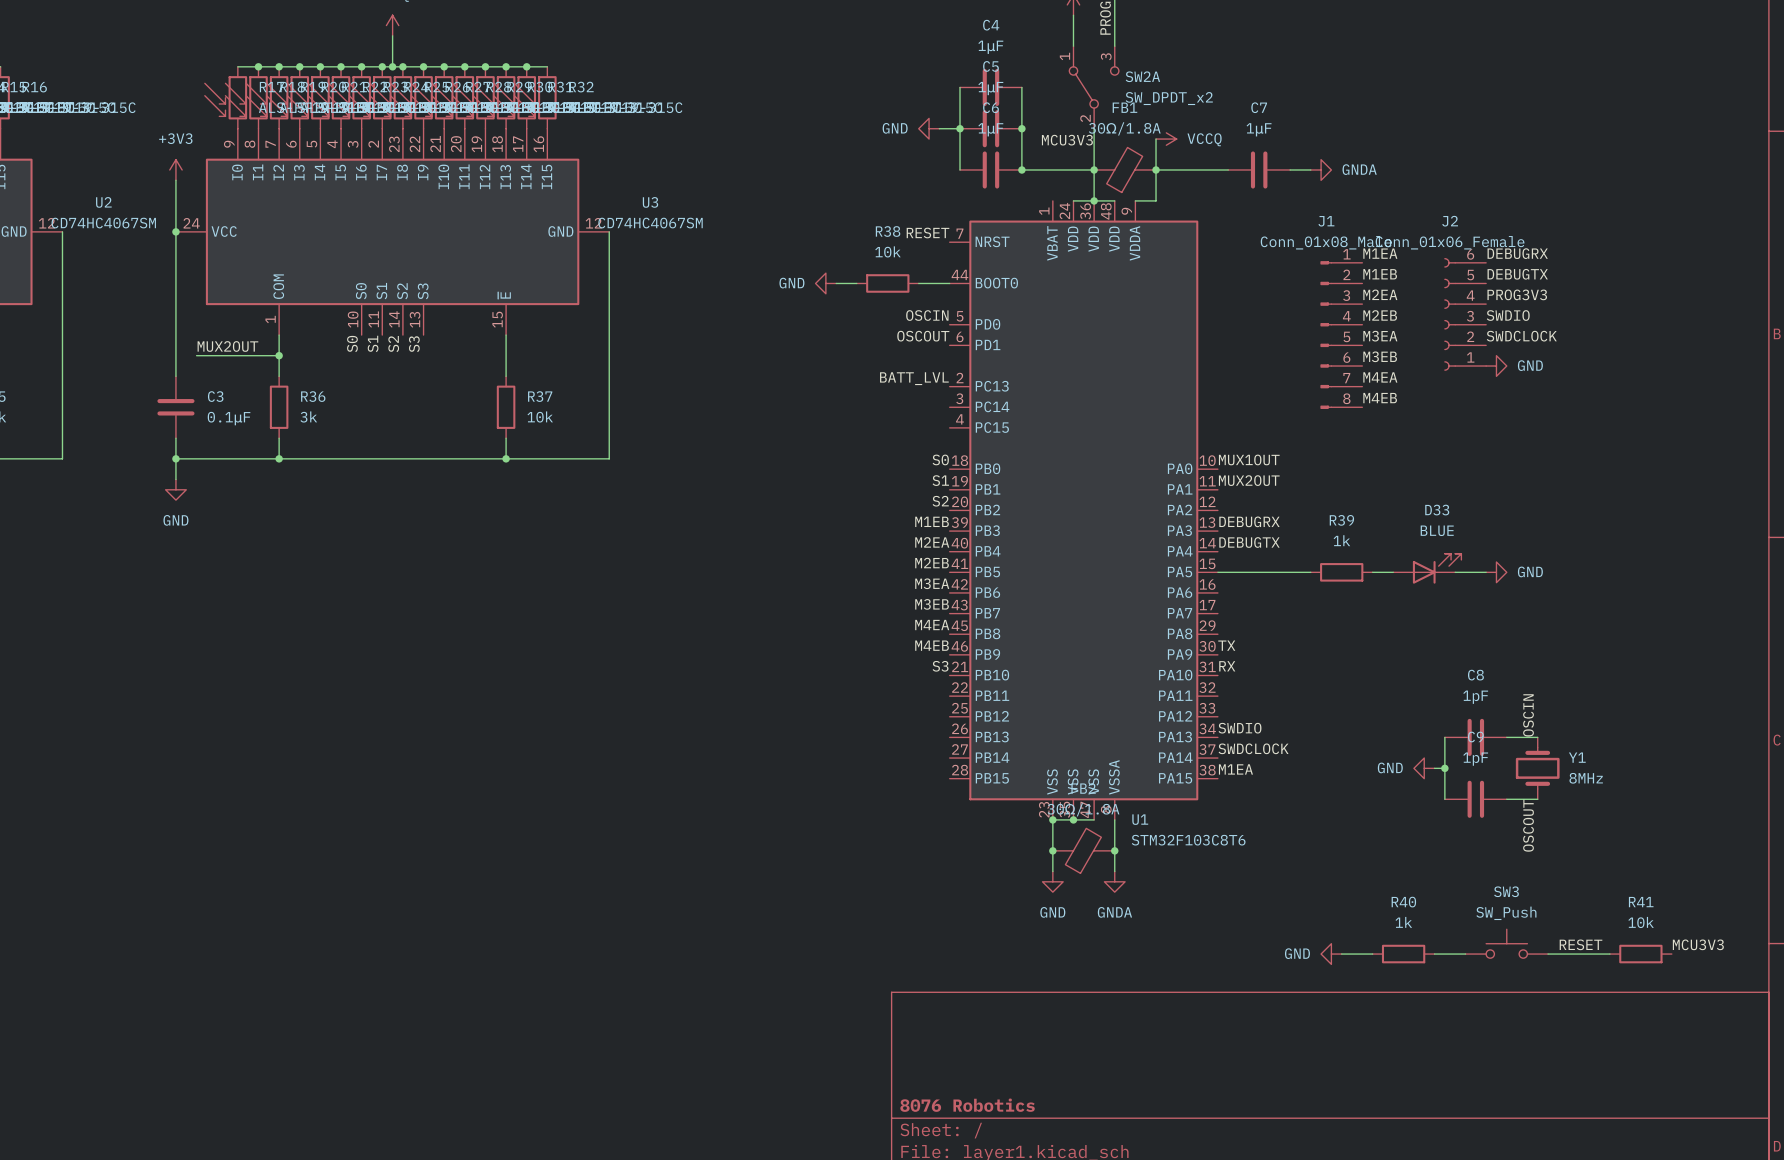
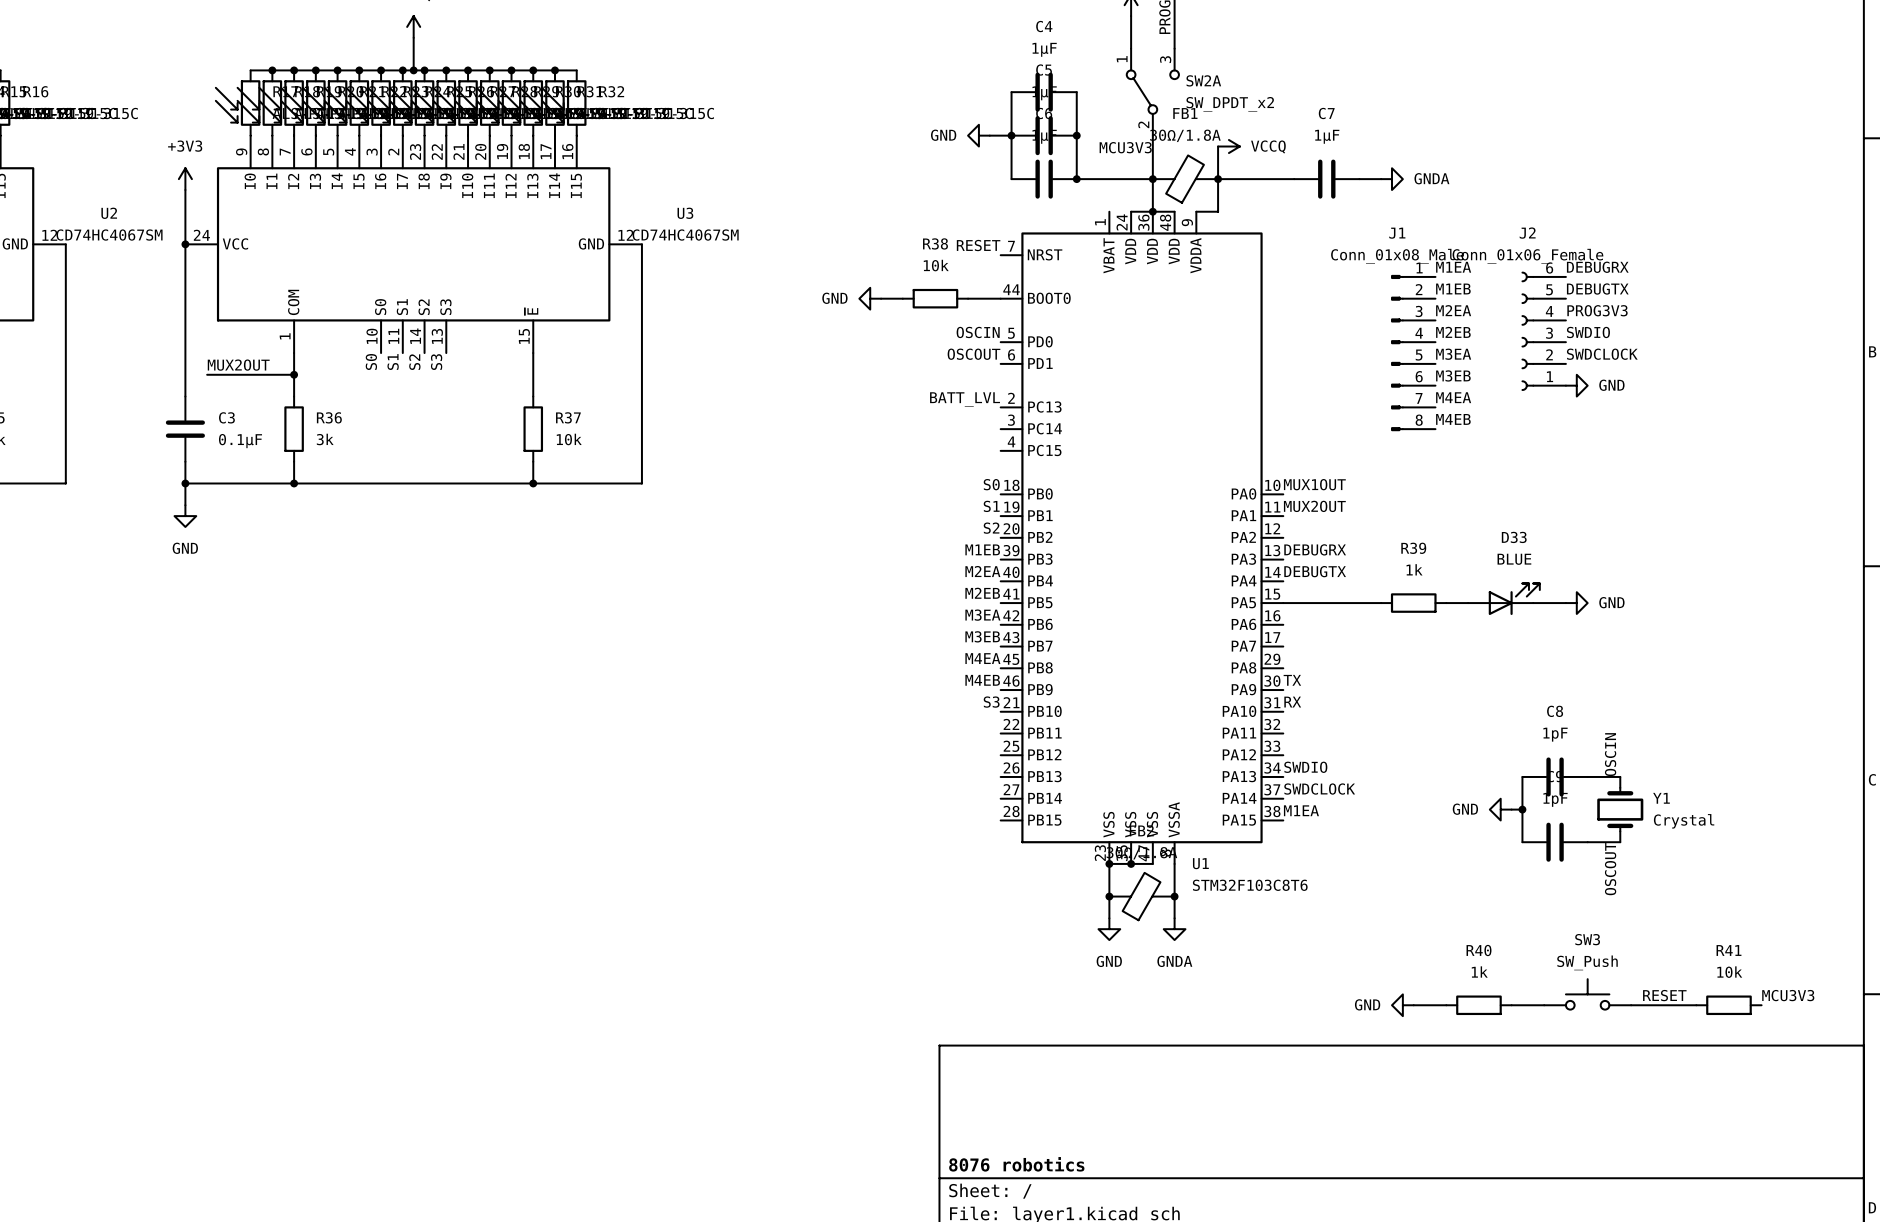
Y1 value: 8MHz (1586, 778) -> Crystal (1684, 821)
title block: 8076 Robotics (967, 1105) -> 8076 robotics (1016, 1164)

